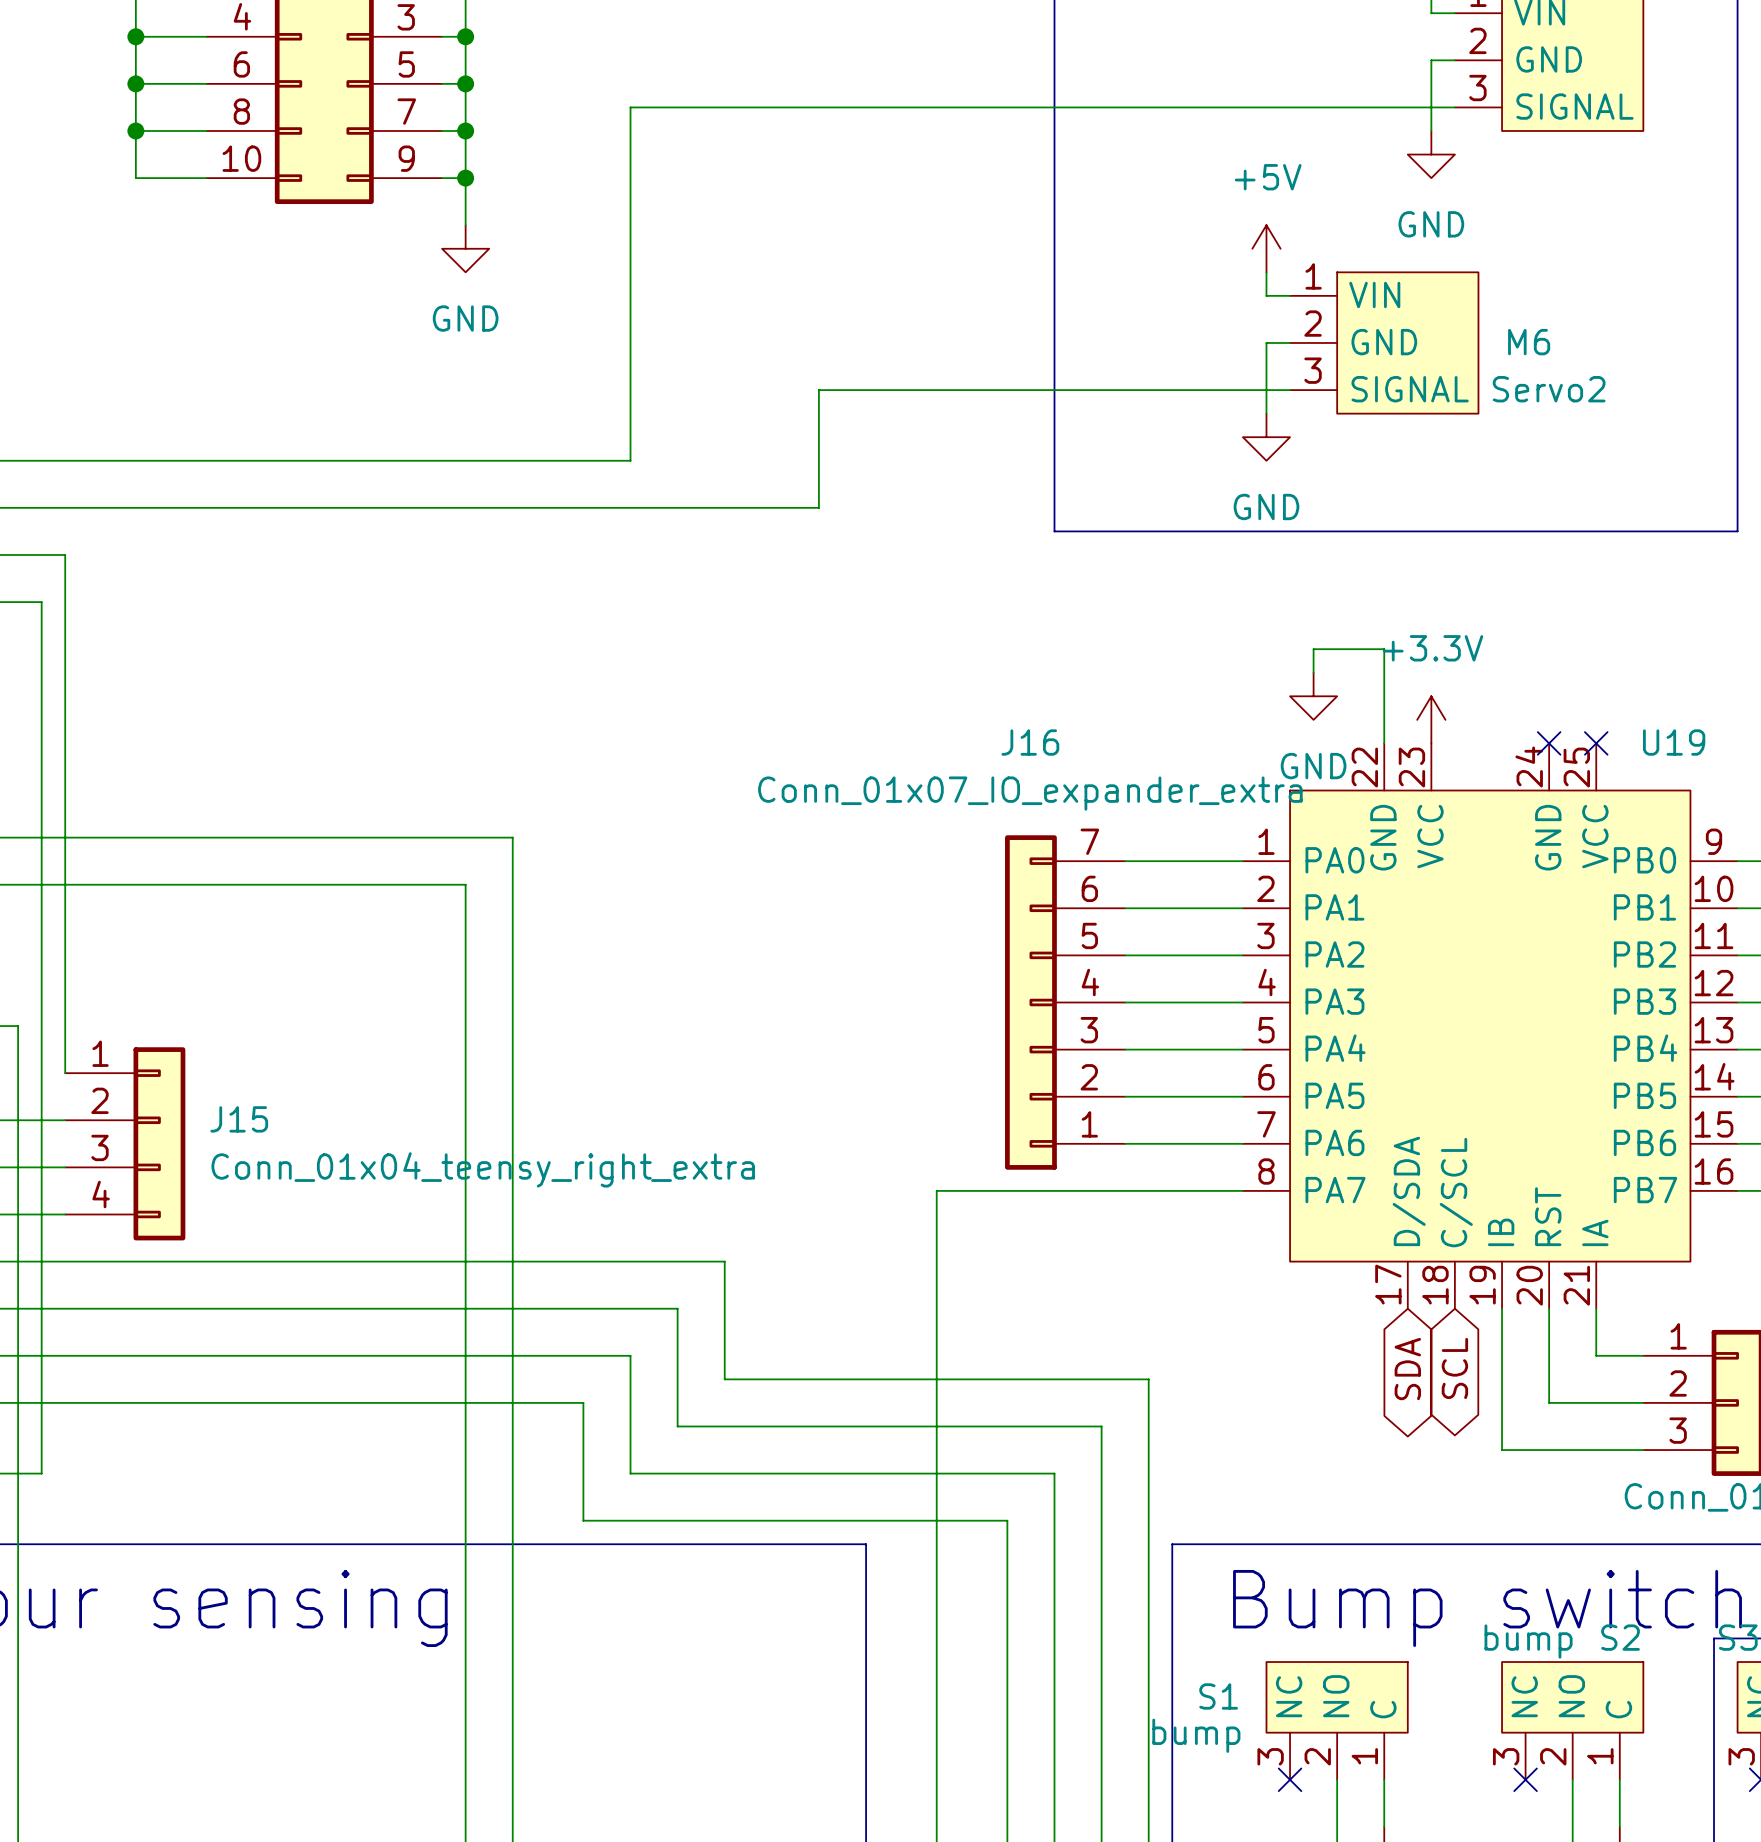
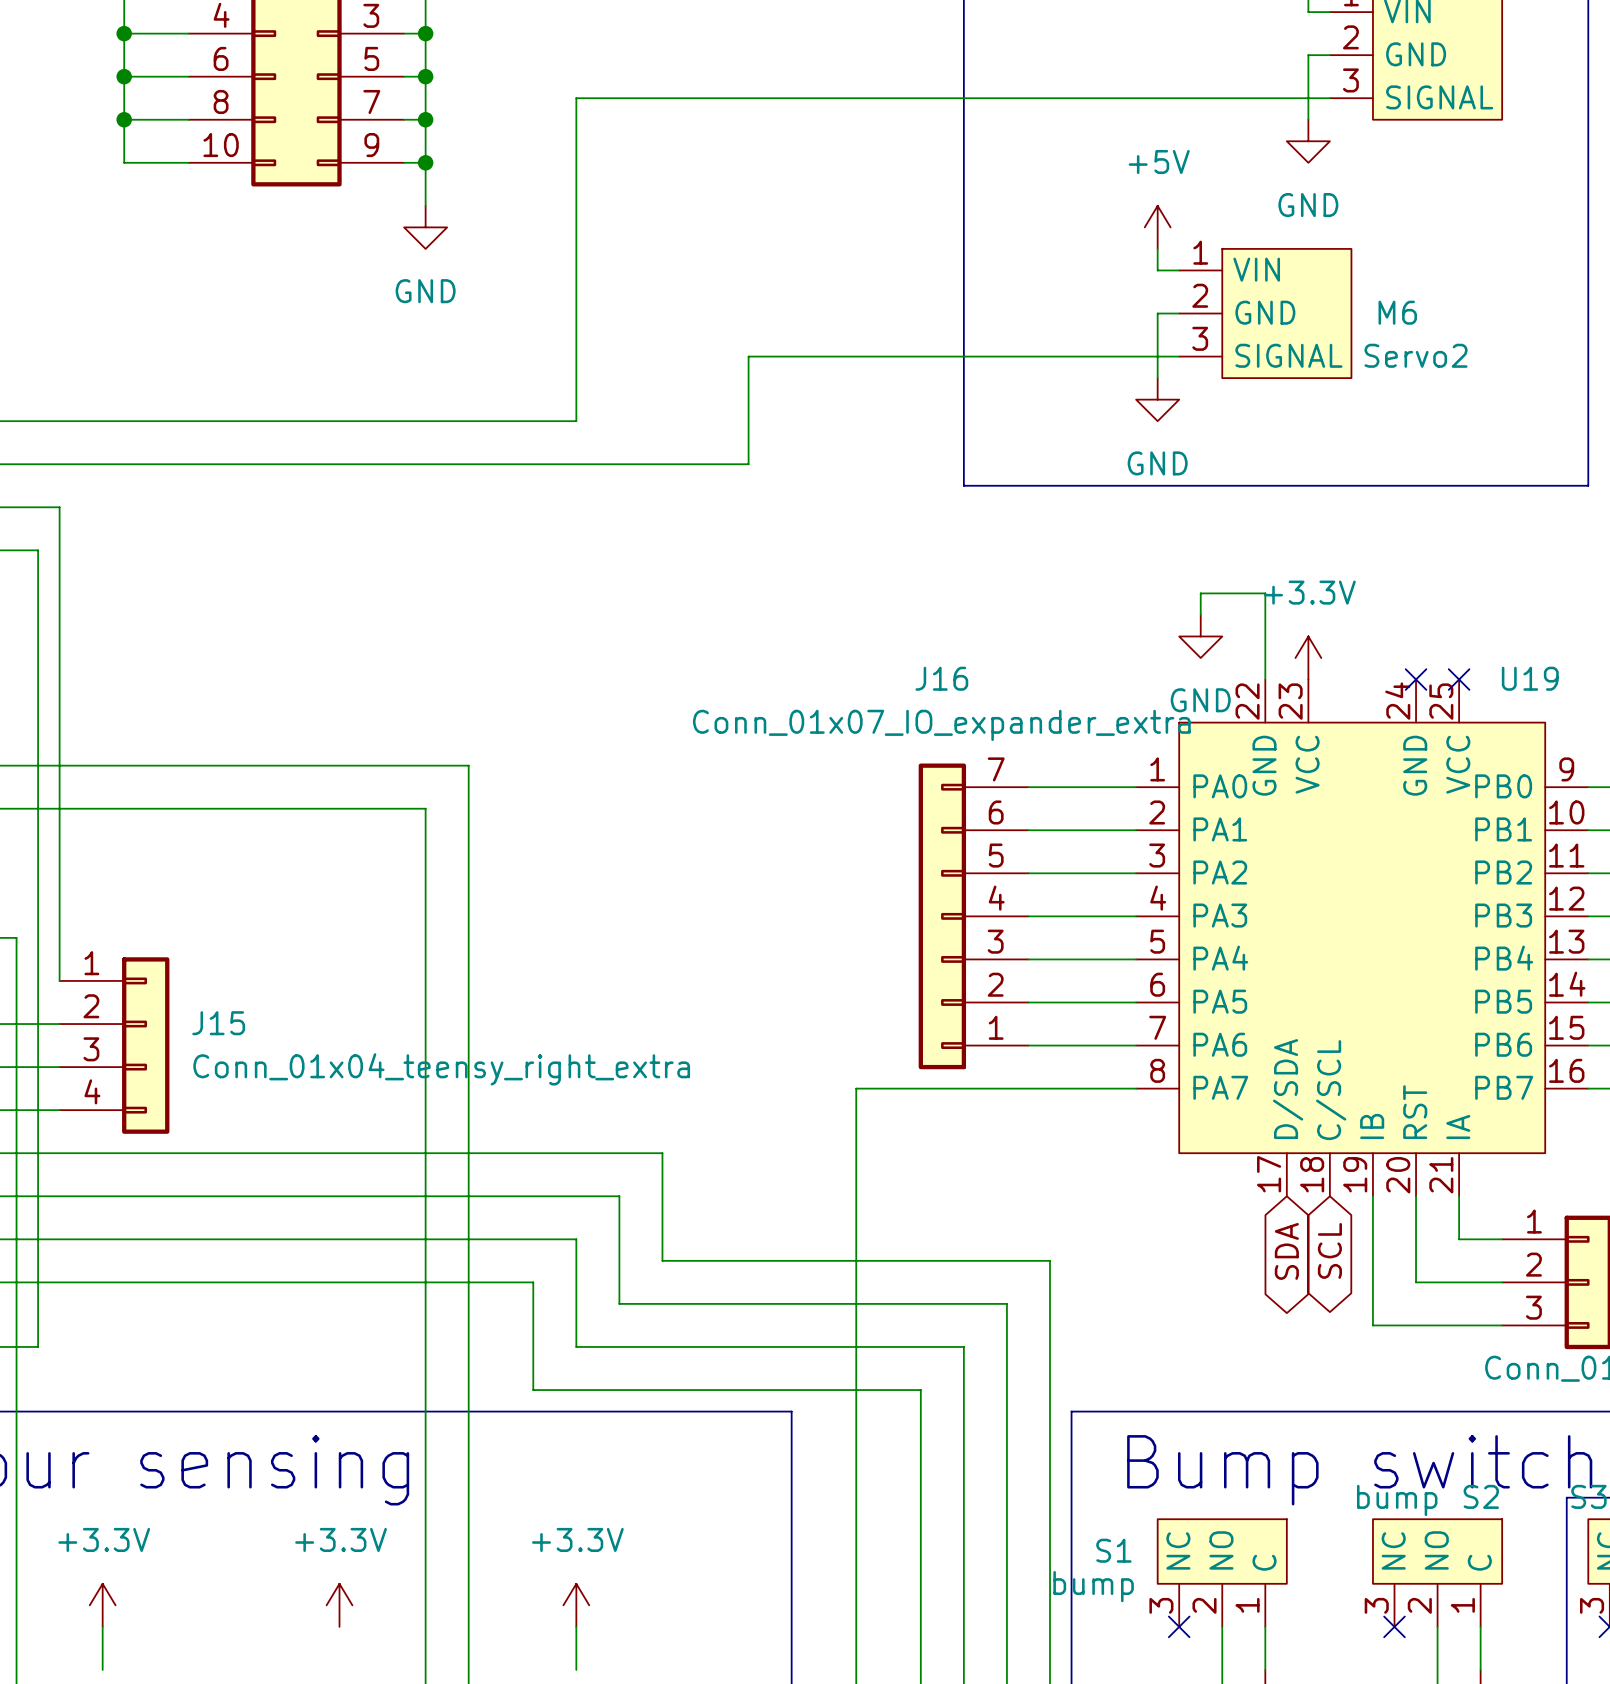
power symbol: none -> +3.3V (102, 1605)
power symbol: none -> +3.3V (339, 1605)
power symbol: none -> +3.3V (576, 1605)
wire: none -> (102, 1626) (102, 1669)
wire: none -> (576, 1626) (576, 1669)

